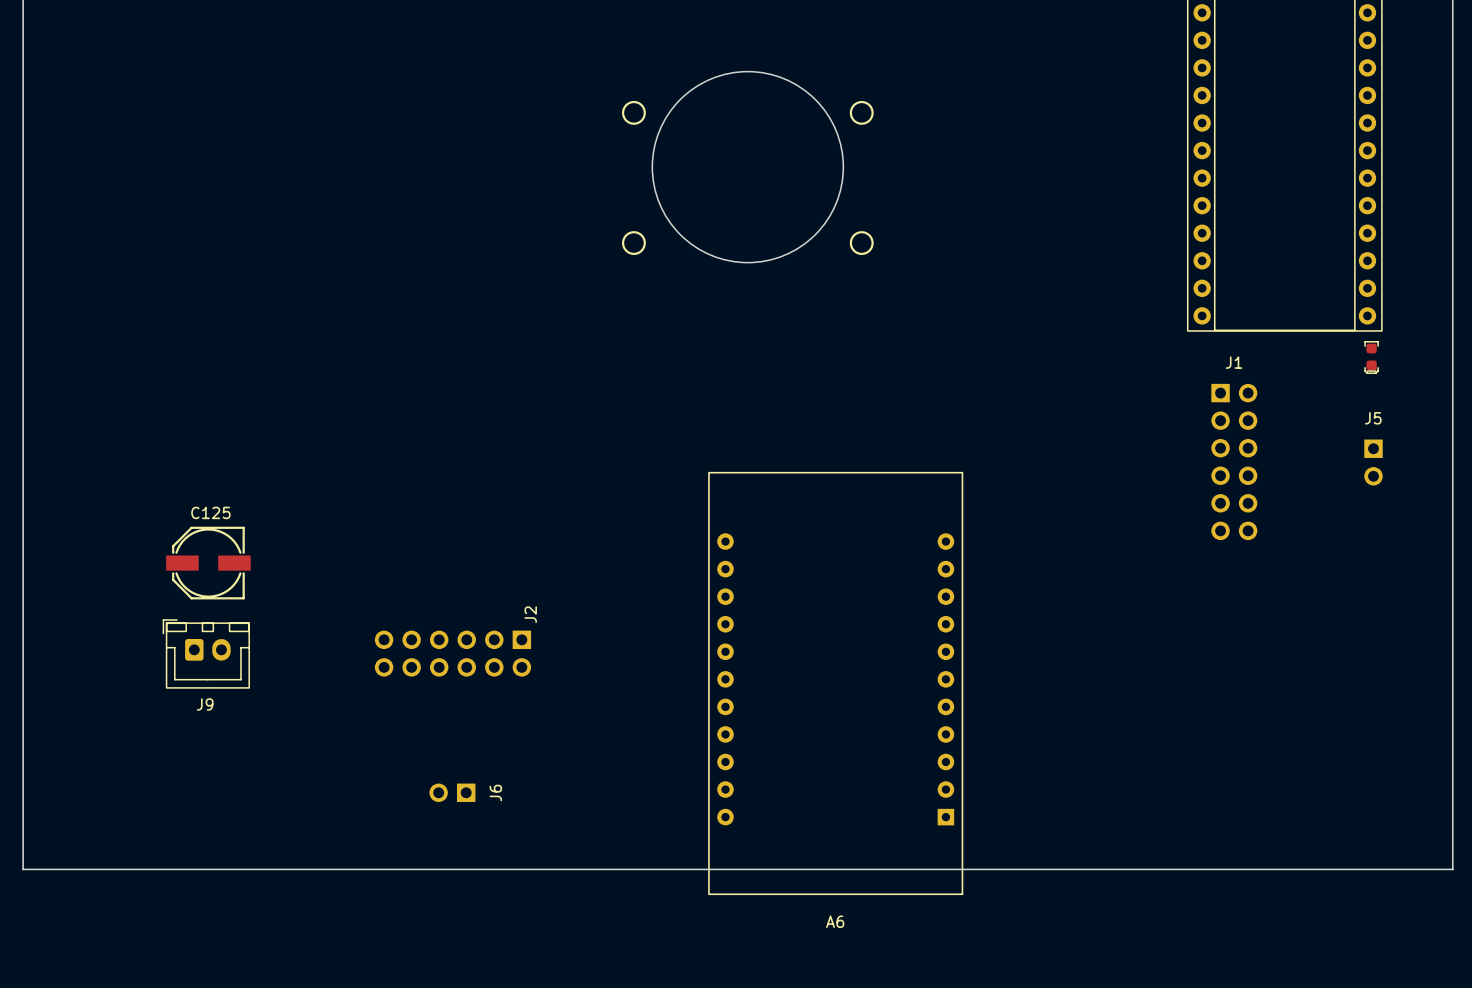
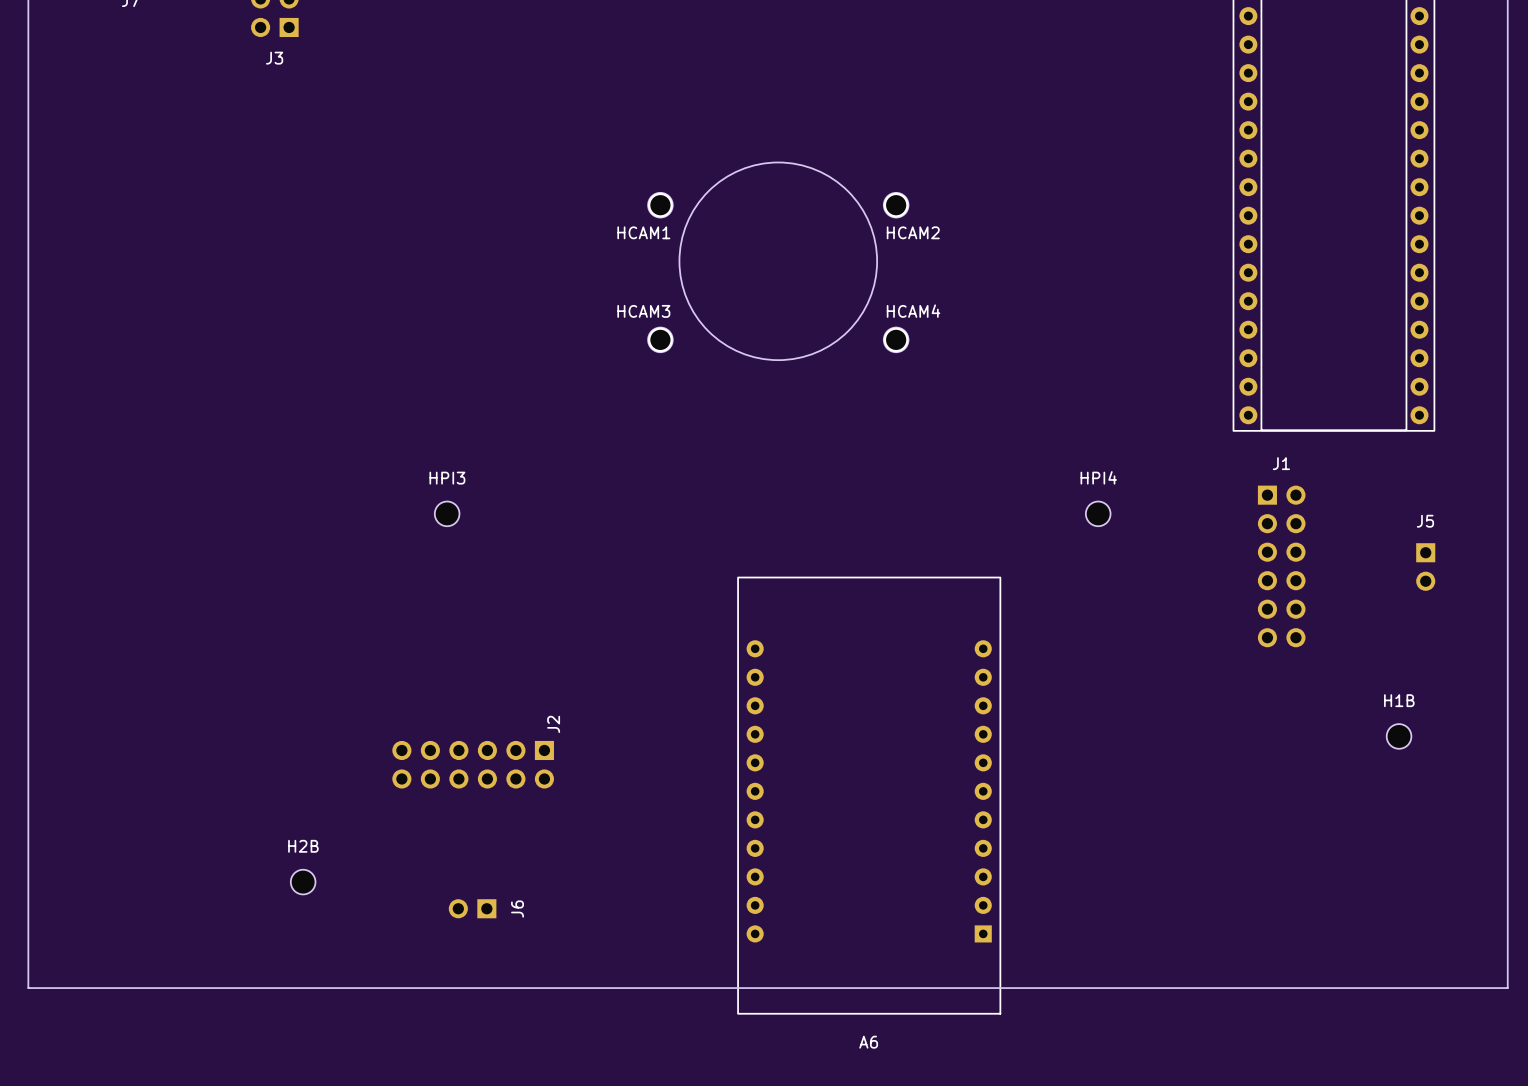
HCAM1: none -> (660, 205)
HCAM2: none -> (896, 205)
HCAM3: none -> (660, 339)
HCAM4: none -> (896, 339)
part: (1371, 357) -> none
HPI3: none -> (447, 513)
HPI4: none -> (1098, 513)
C125: (208, 563) -> none
H1B: none -> (1399, 736)
J9: (206, 653) -> none
H2B: none -> (303, 882)

